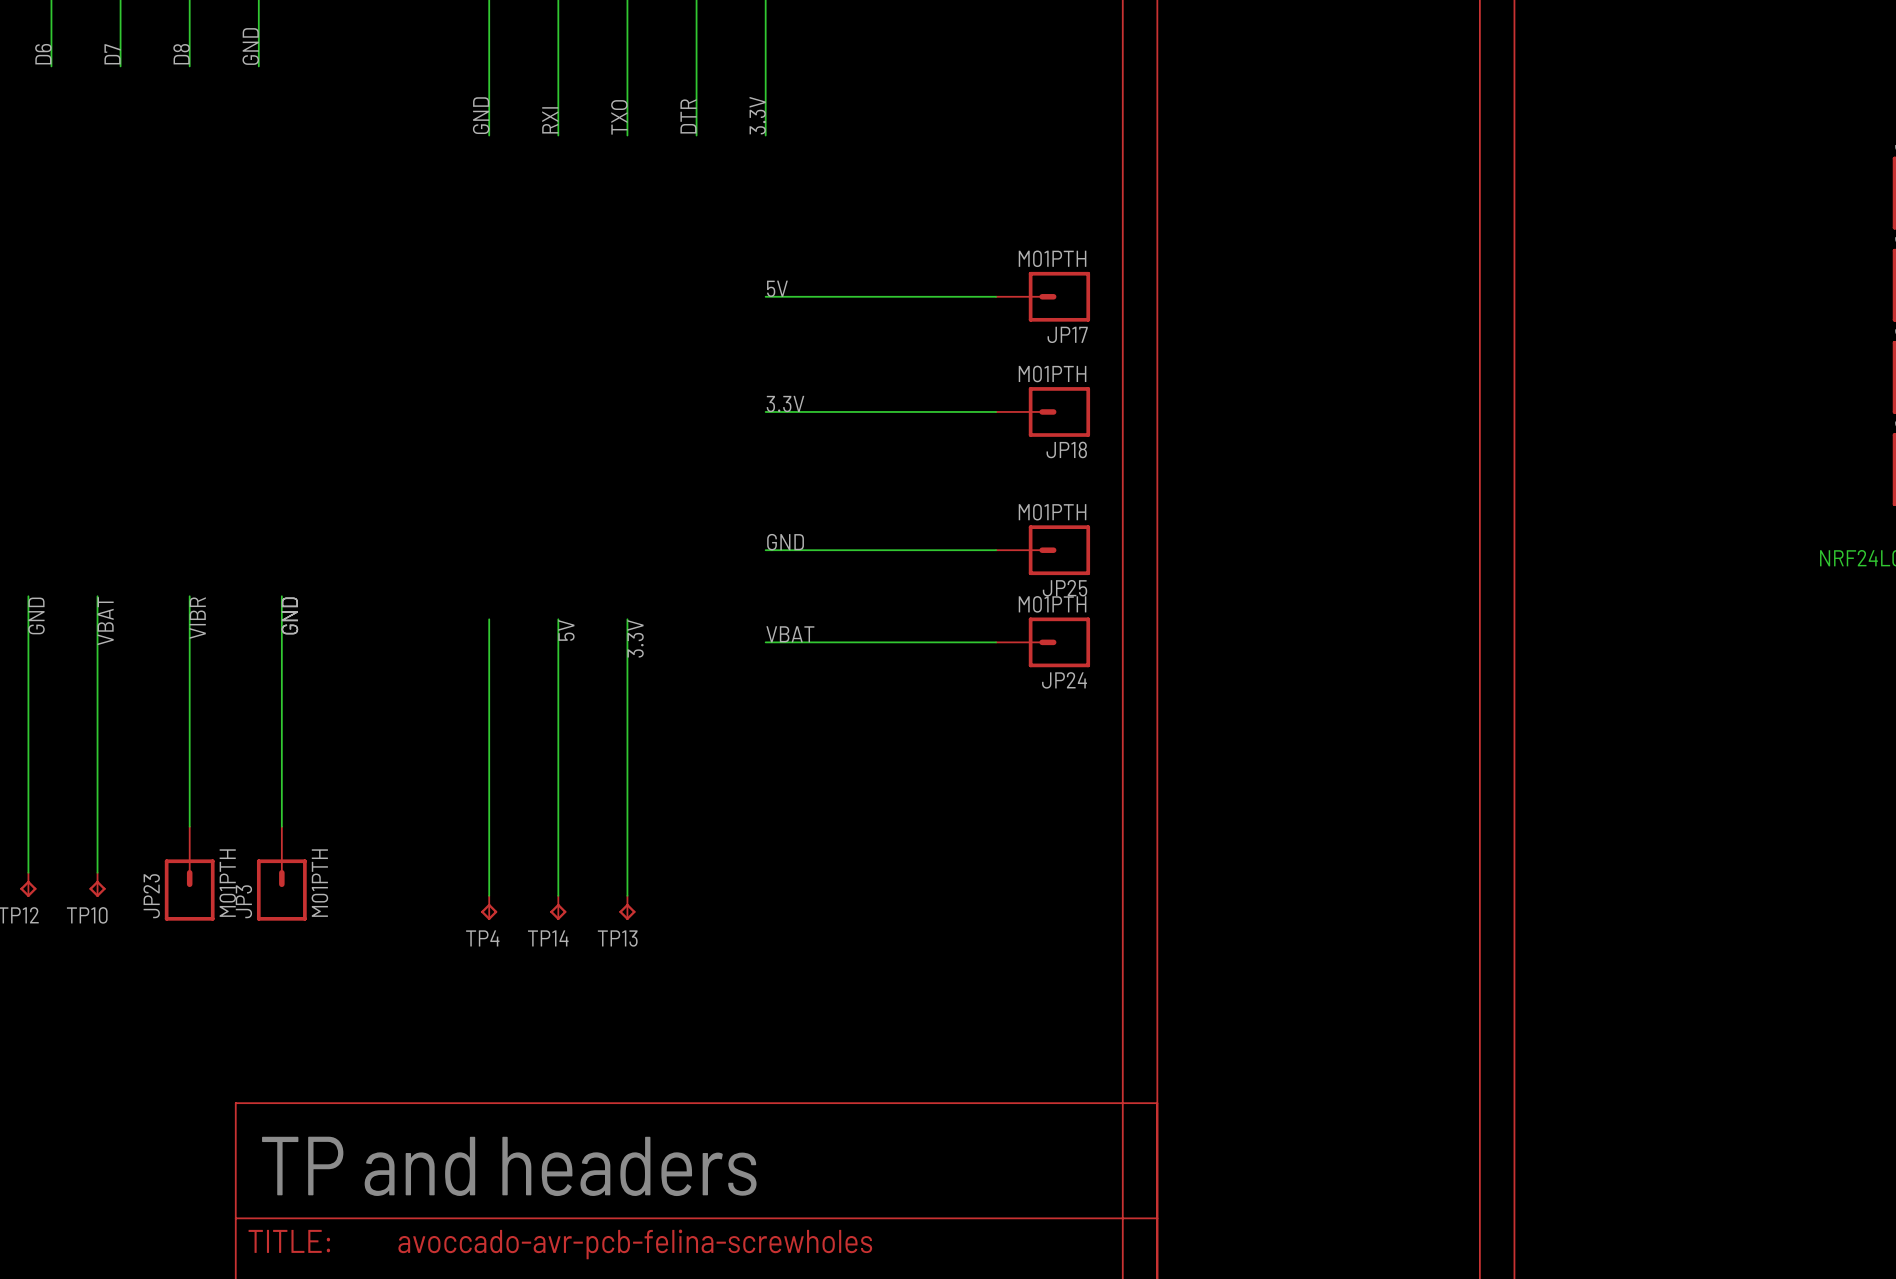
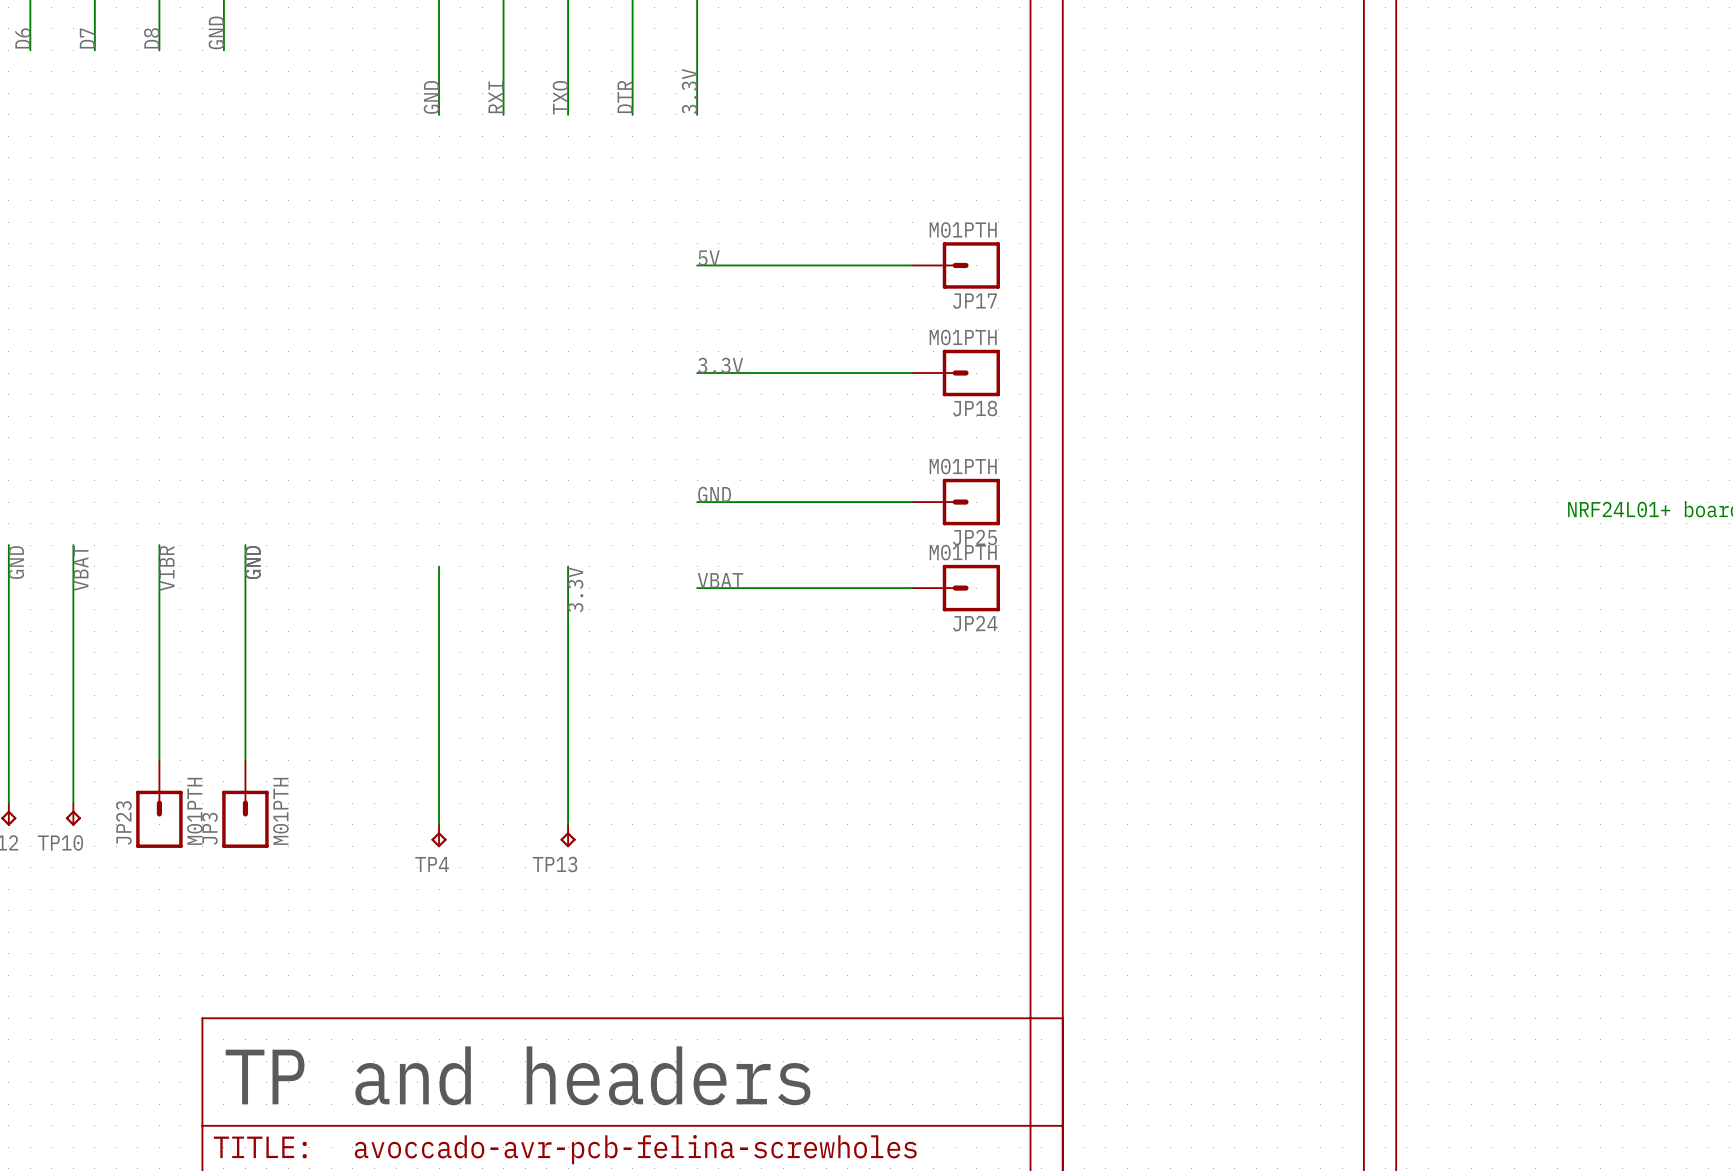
wire: (558, 619) (558, 895) -> none
label: 5V (566, 630) -> none
TP14: (558, 907) -> none

